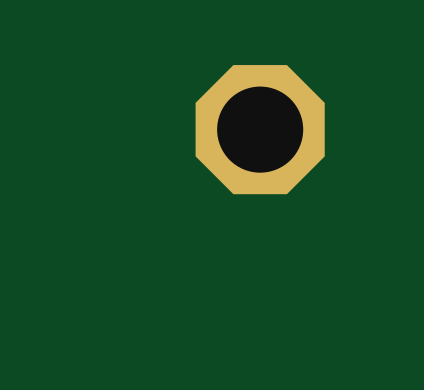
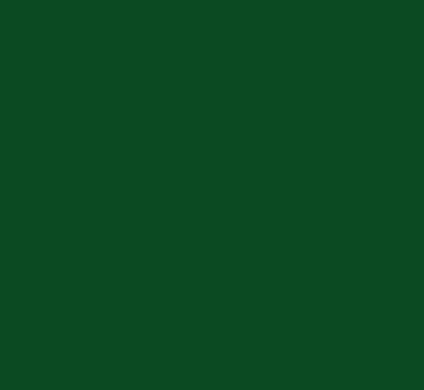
part: (260, 129) -> none

